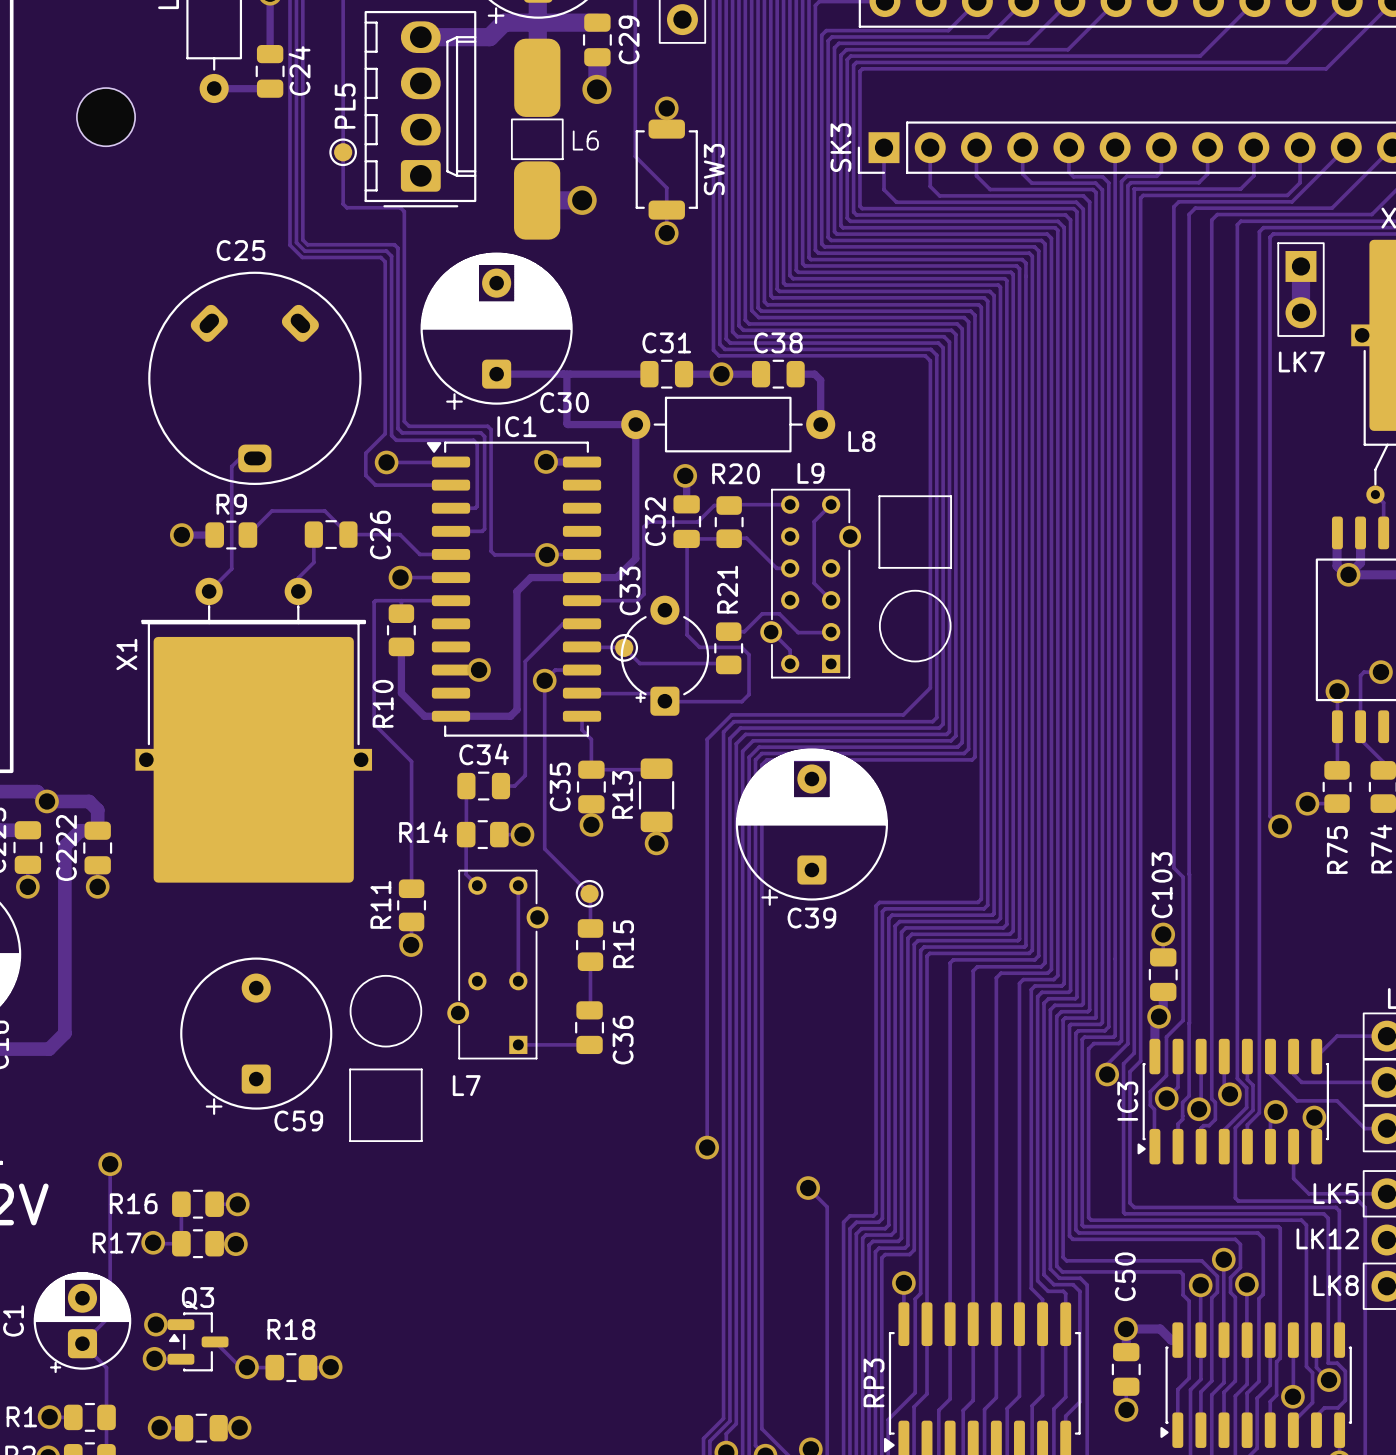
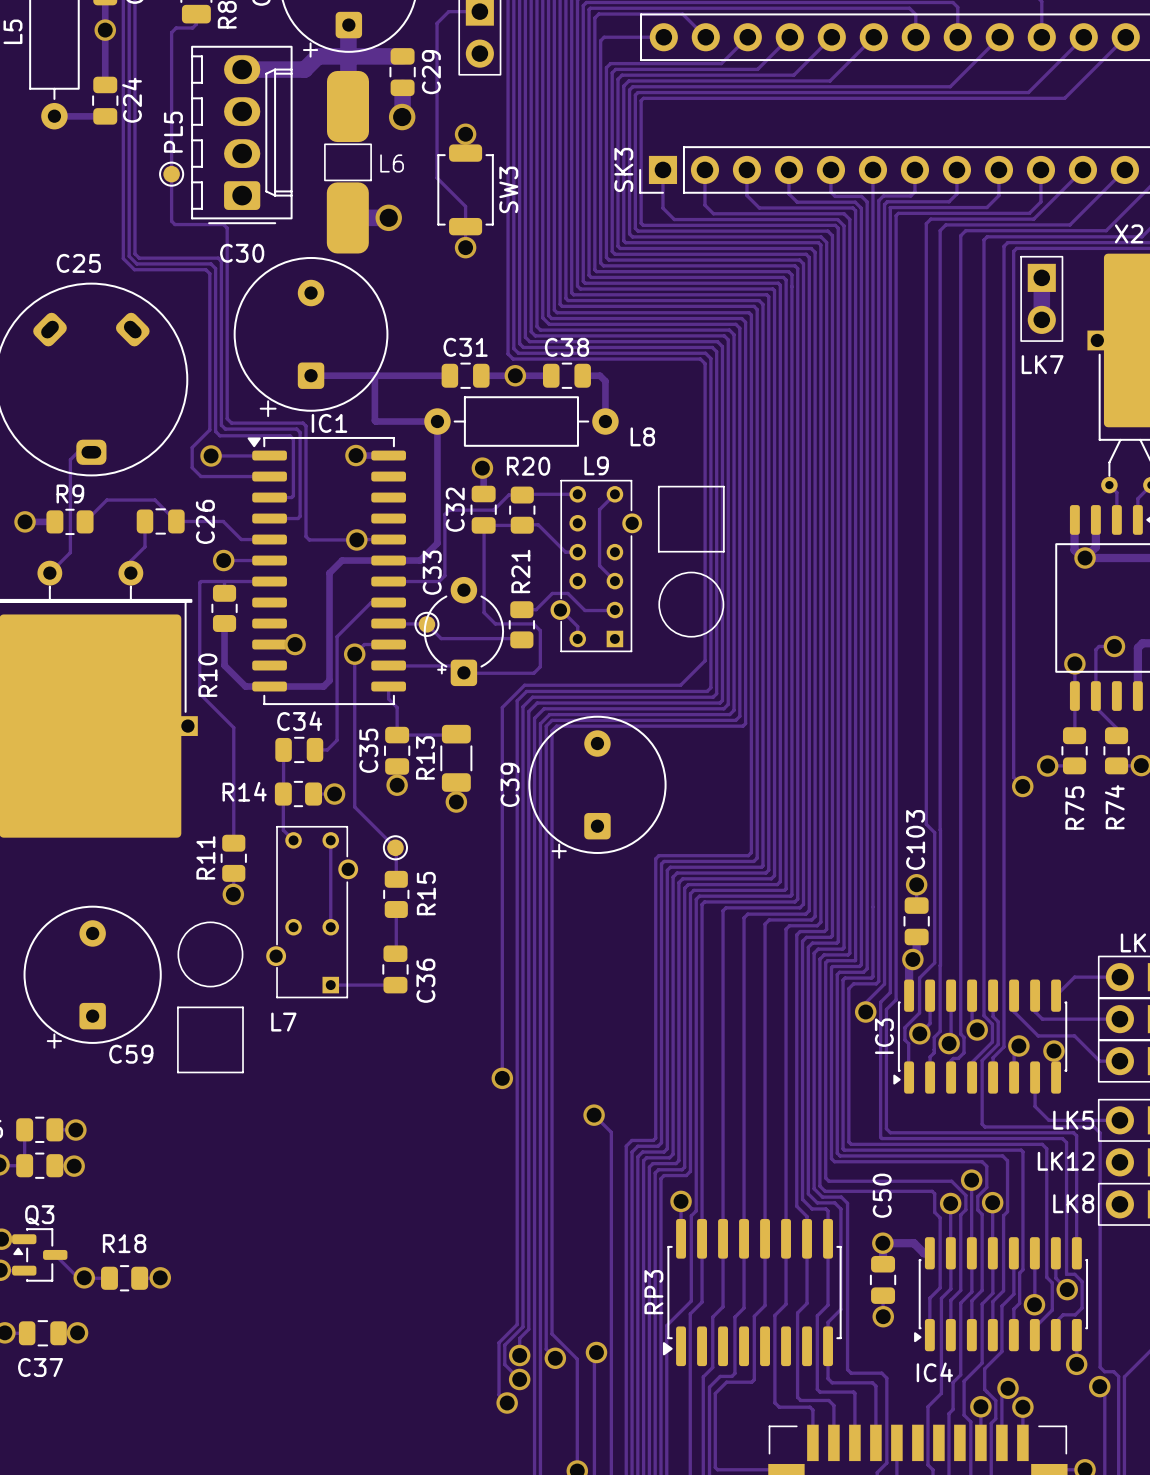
C30 footprint: [420, 252, 573, 410] -> [233, 256, 389, 418]
C30 name position: C30 (564, 402) -> C30 (242, 253)
C39 footprint: [735, 748, 888, 906] -> [528, 715, 667, 859]
C39 name position: C39 (811, 918) -> C39 (510, 784)

